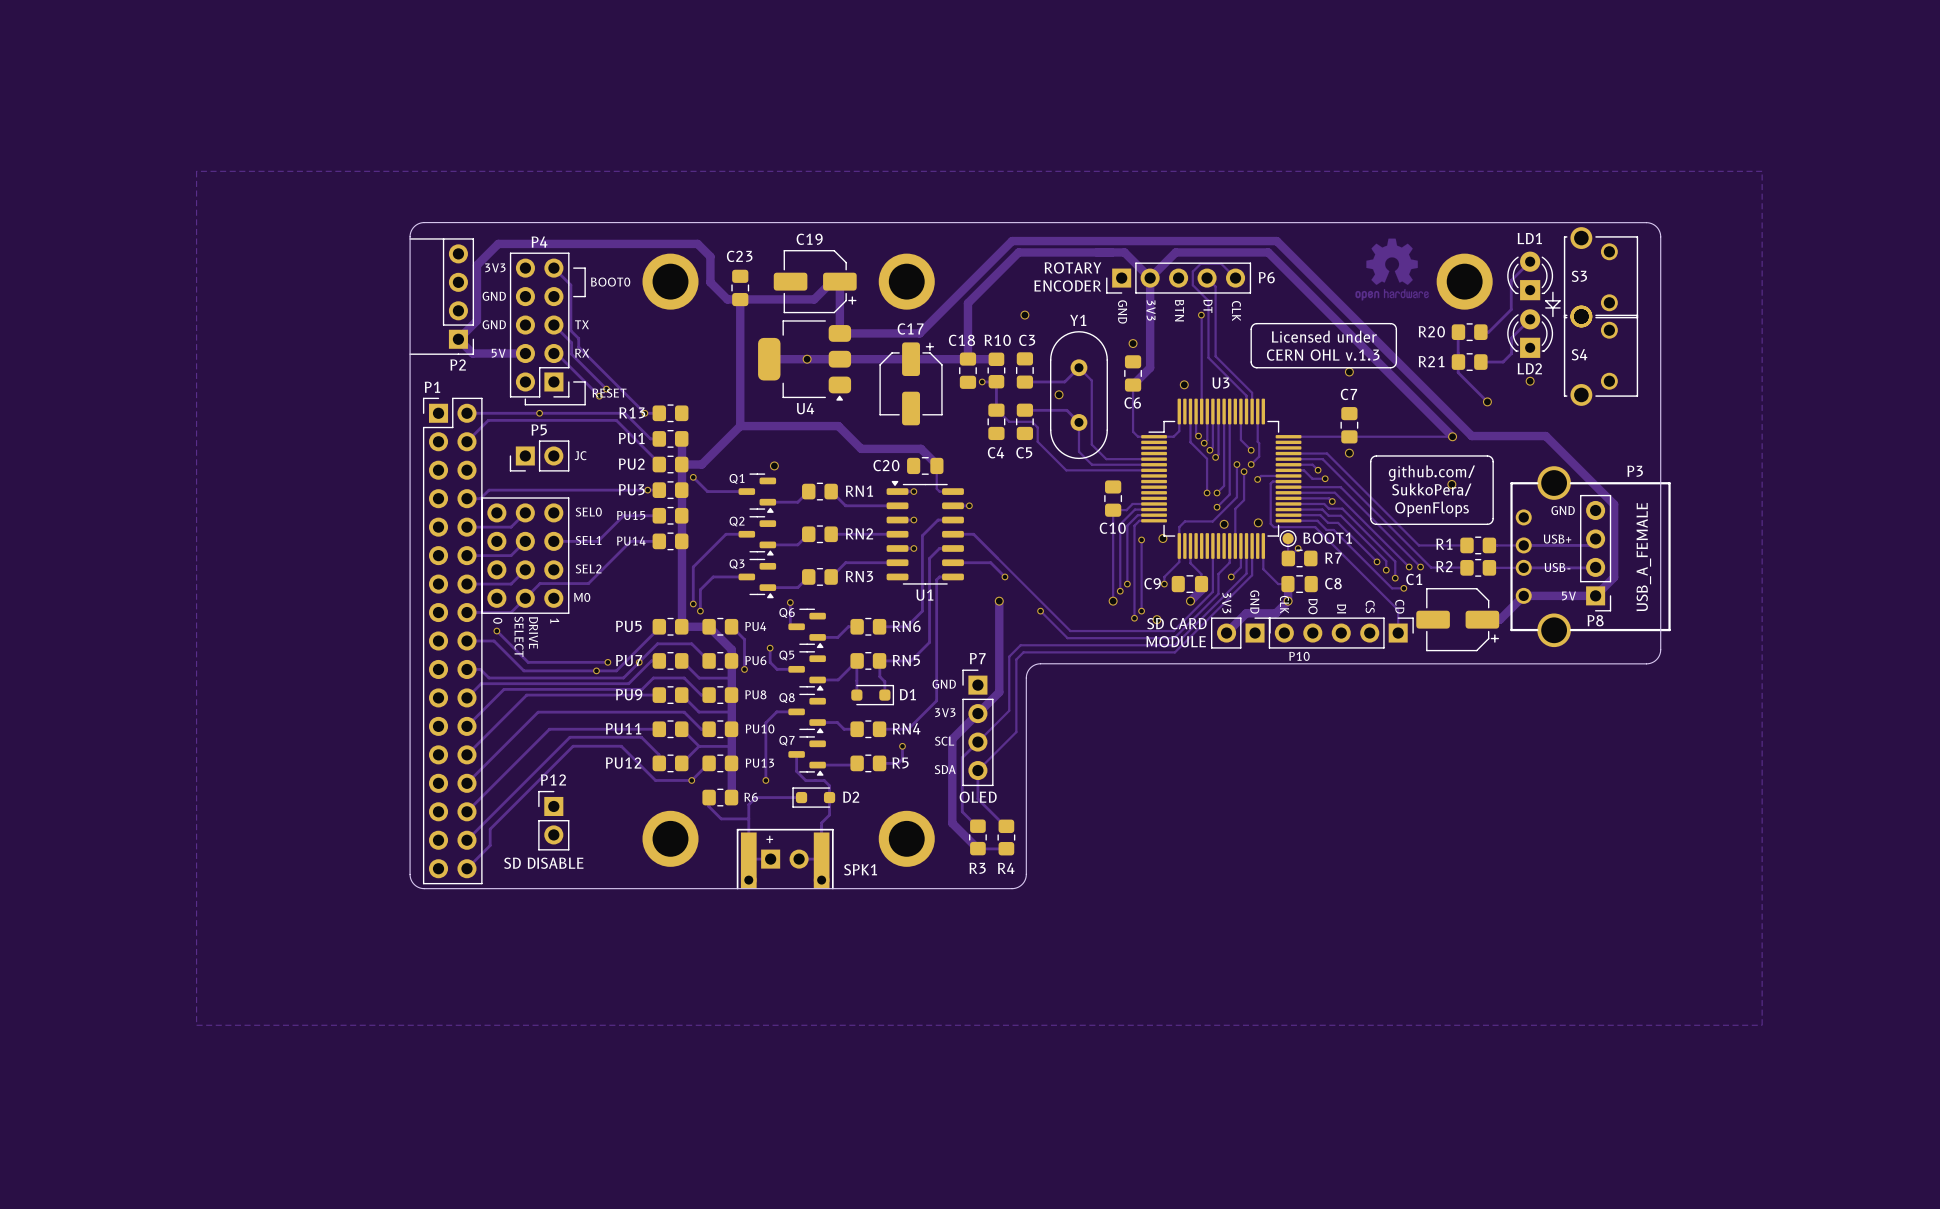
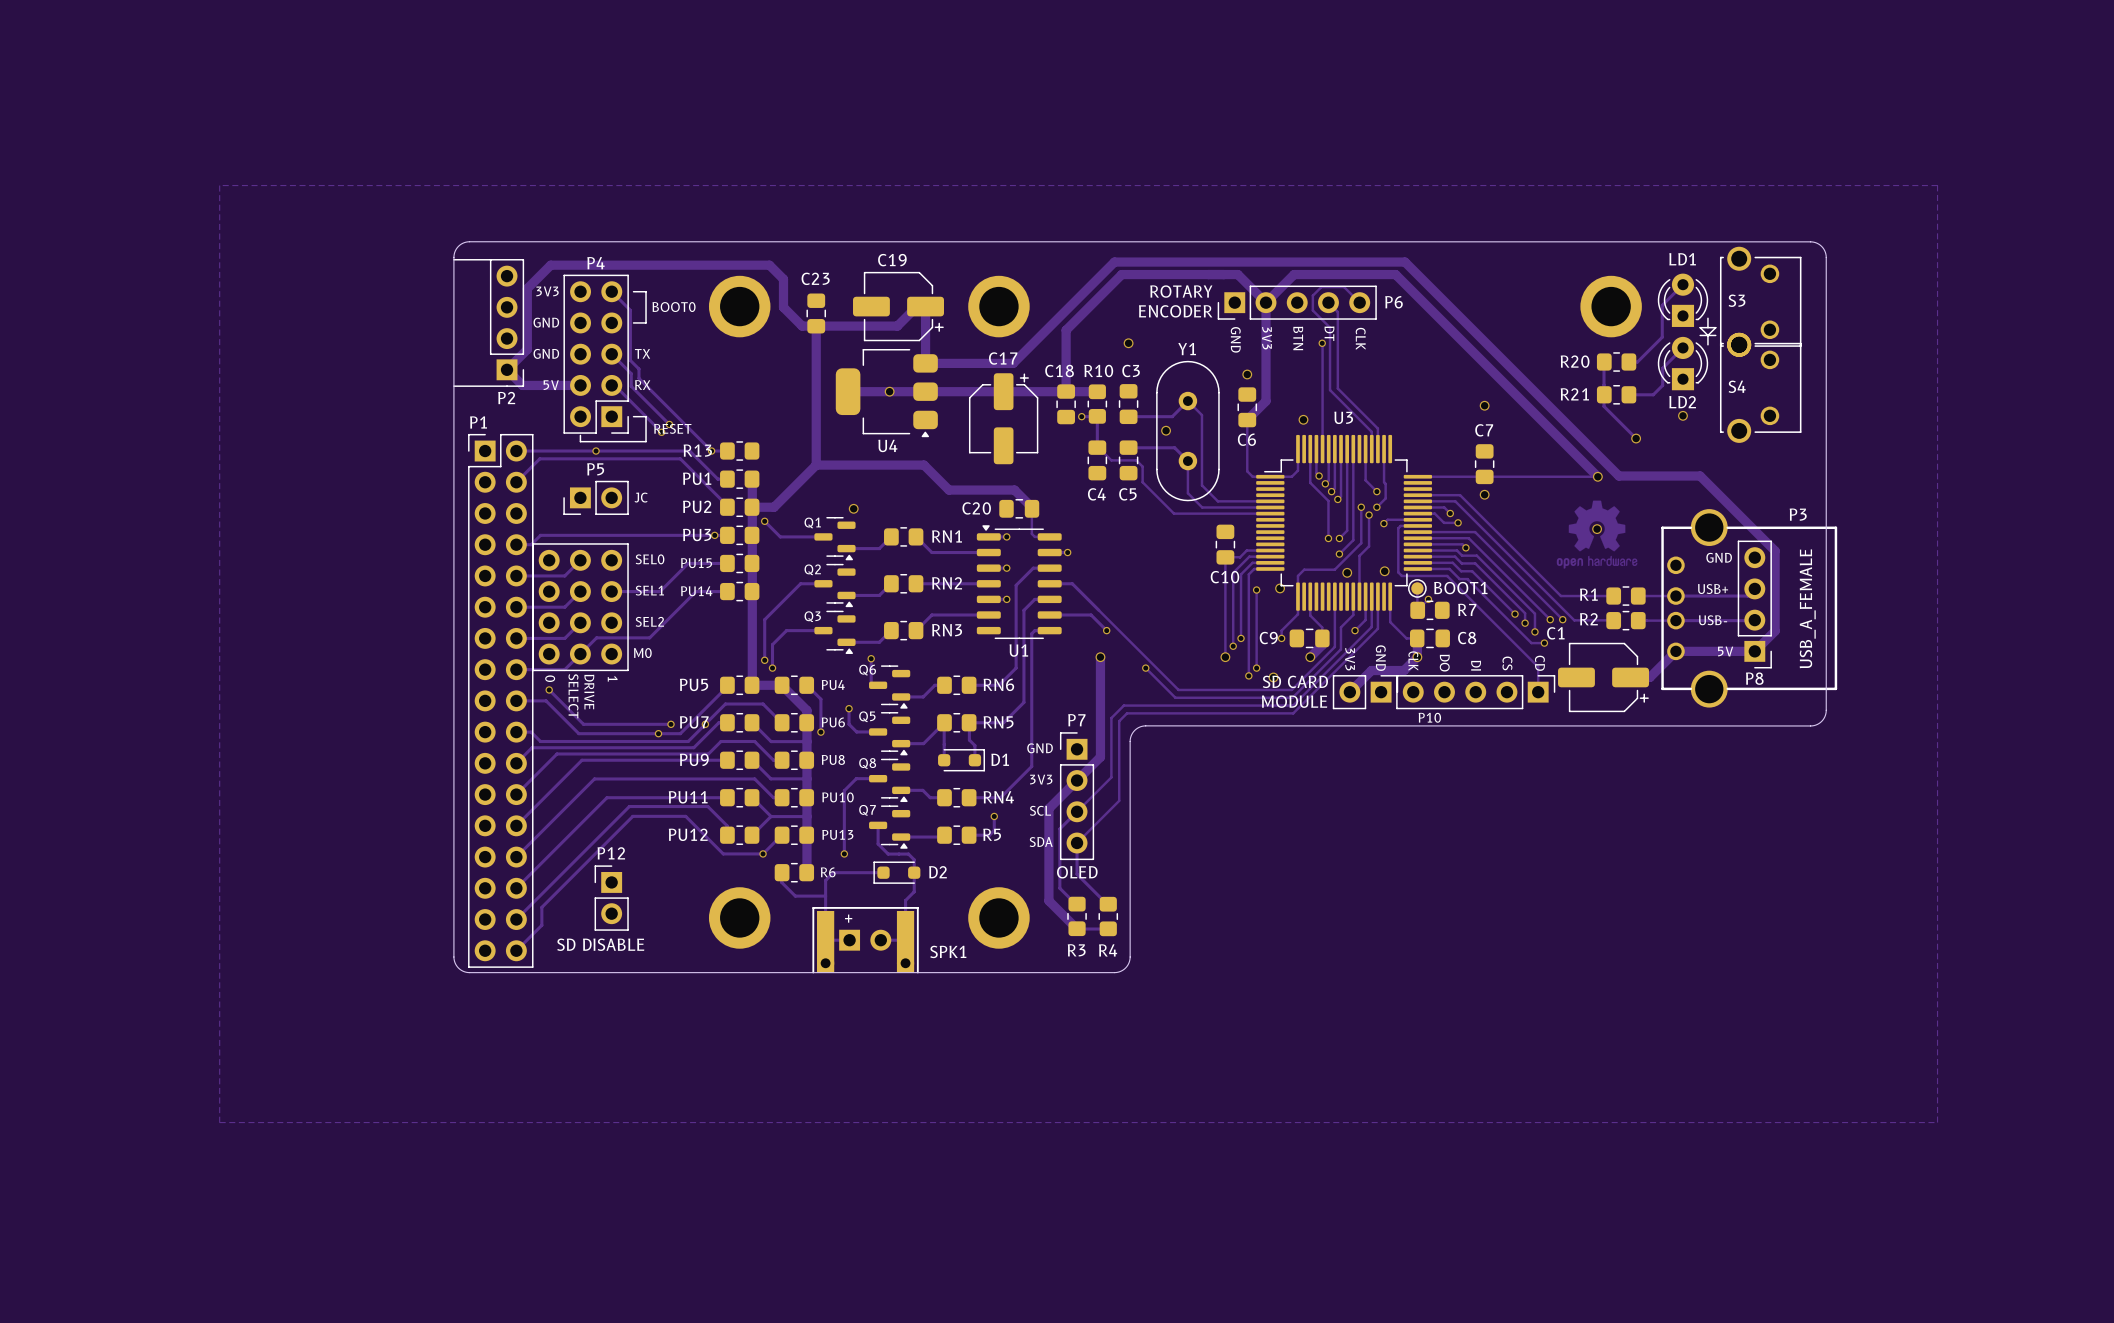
drawing position: (1392, 269) -> (1597, 534)
line: (1256, 323) (1392, 323) (1396, 328) (1396, 363) (1390, 367) (1255, 367) (1251, 362) (1251, 329) (1252, 325) (1256, 323) -> none
text: Licensed under (1324, 336) -> none
text: CERN OHL v.1.3 (1323, 355) -> none
line: (1376, 455) (1490, 456) (1493, 461) (1492, 521) (1487, 524) (1373, 523) (1370, 518) (1370, 461) (1372, 457) (1376, 455) -> none
text: github.com/ (1431, 473) -> none
text: SukkoPera/ (1431, 489) -> none
text: OpenFlops (1432, 509) -> none

